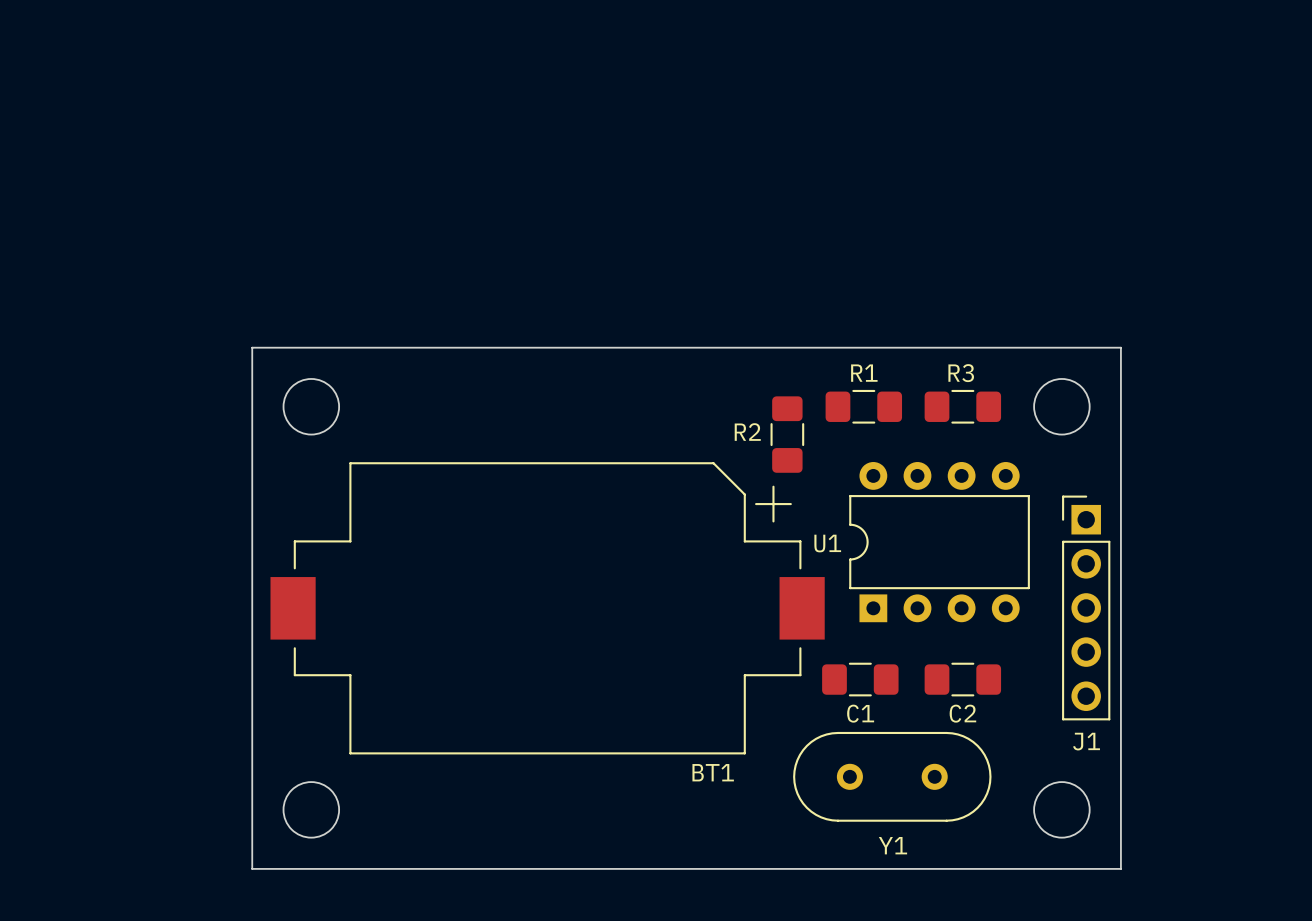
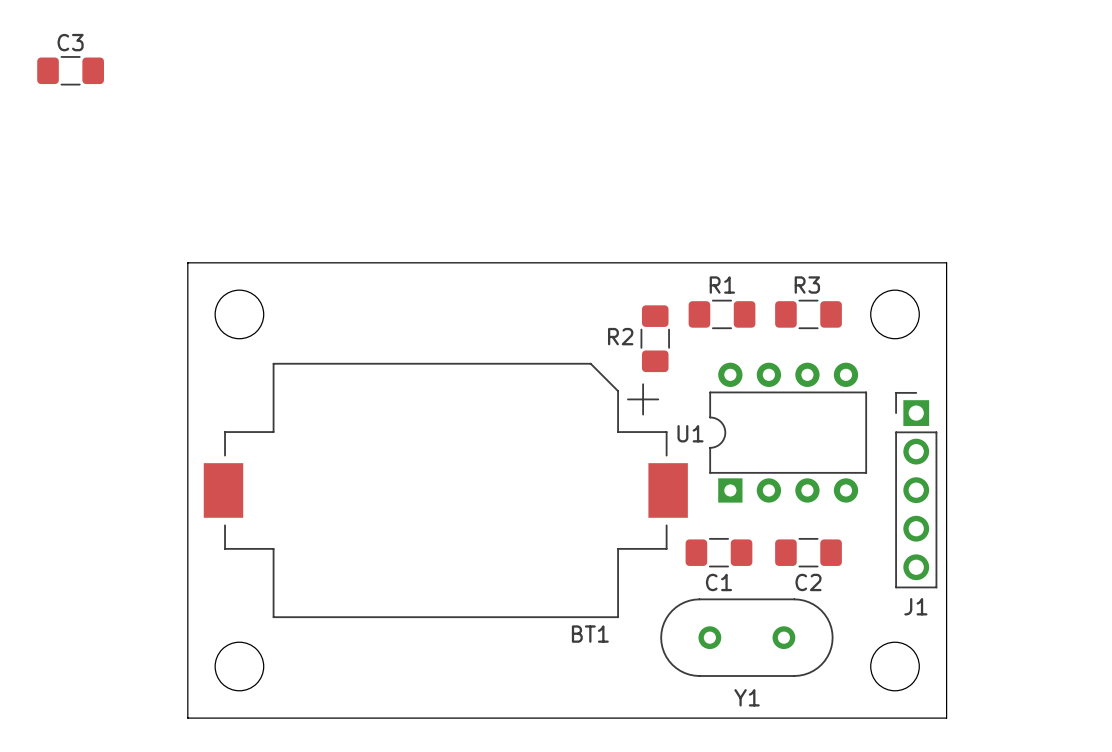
C3: none -> (70, 70)

